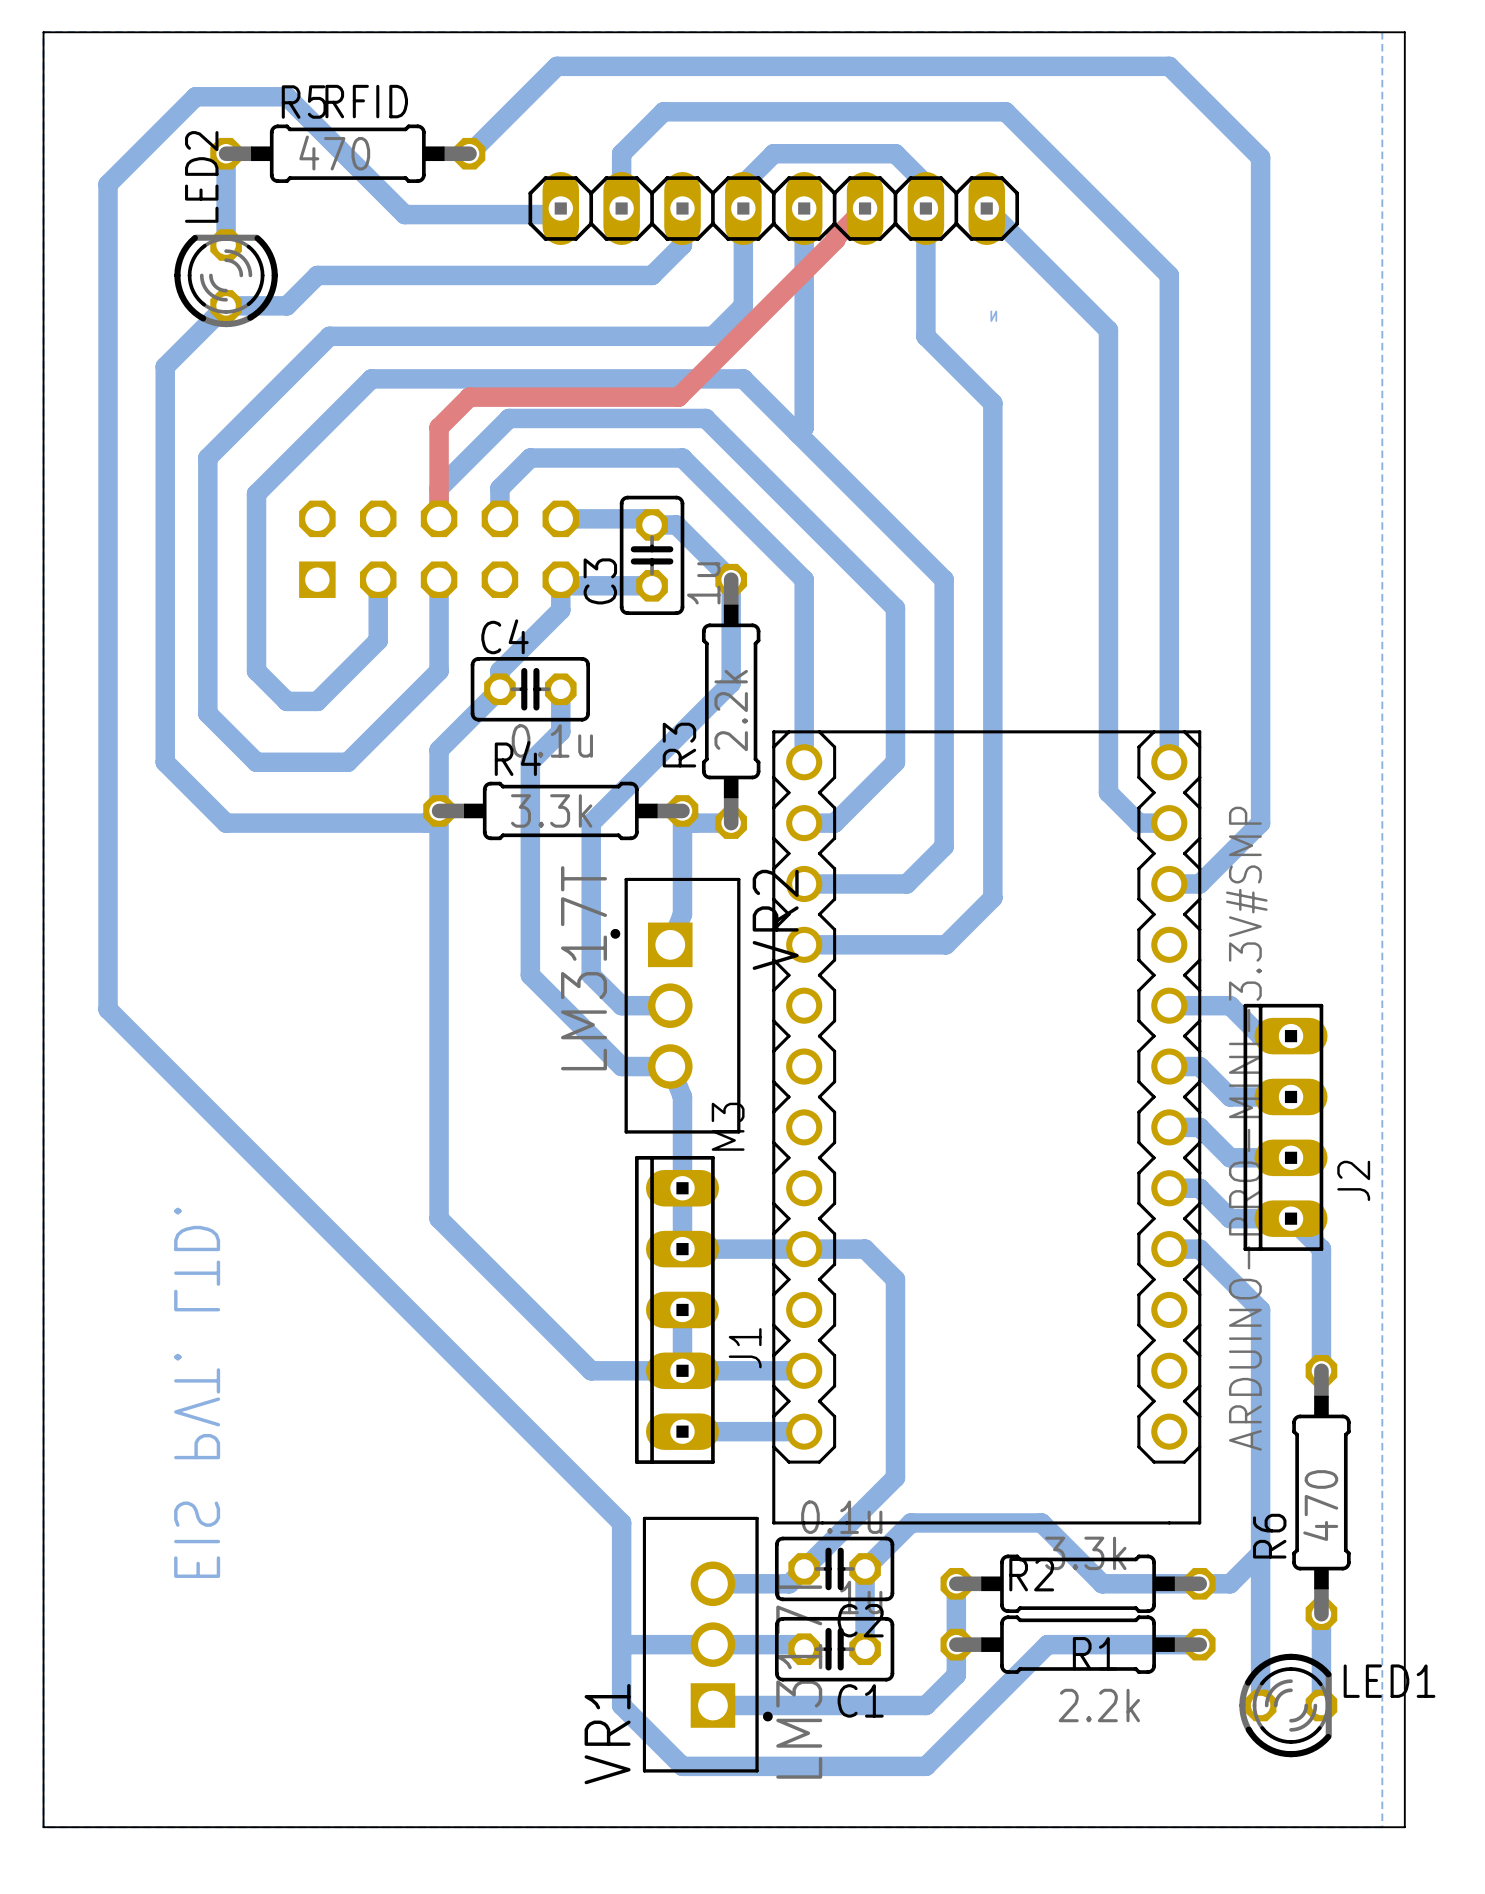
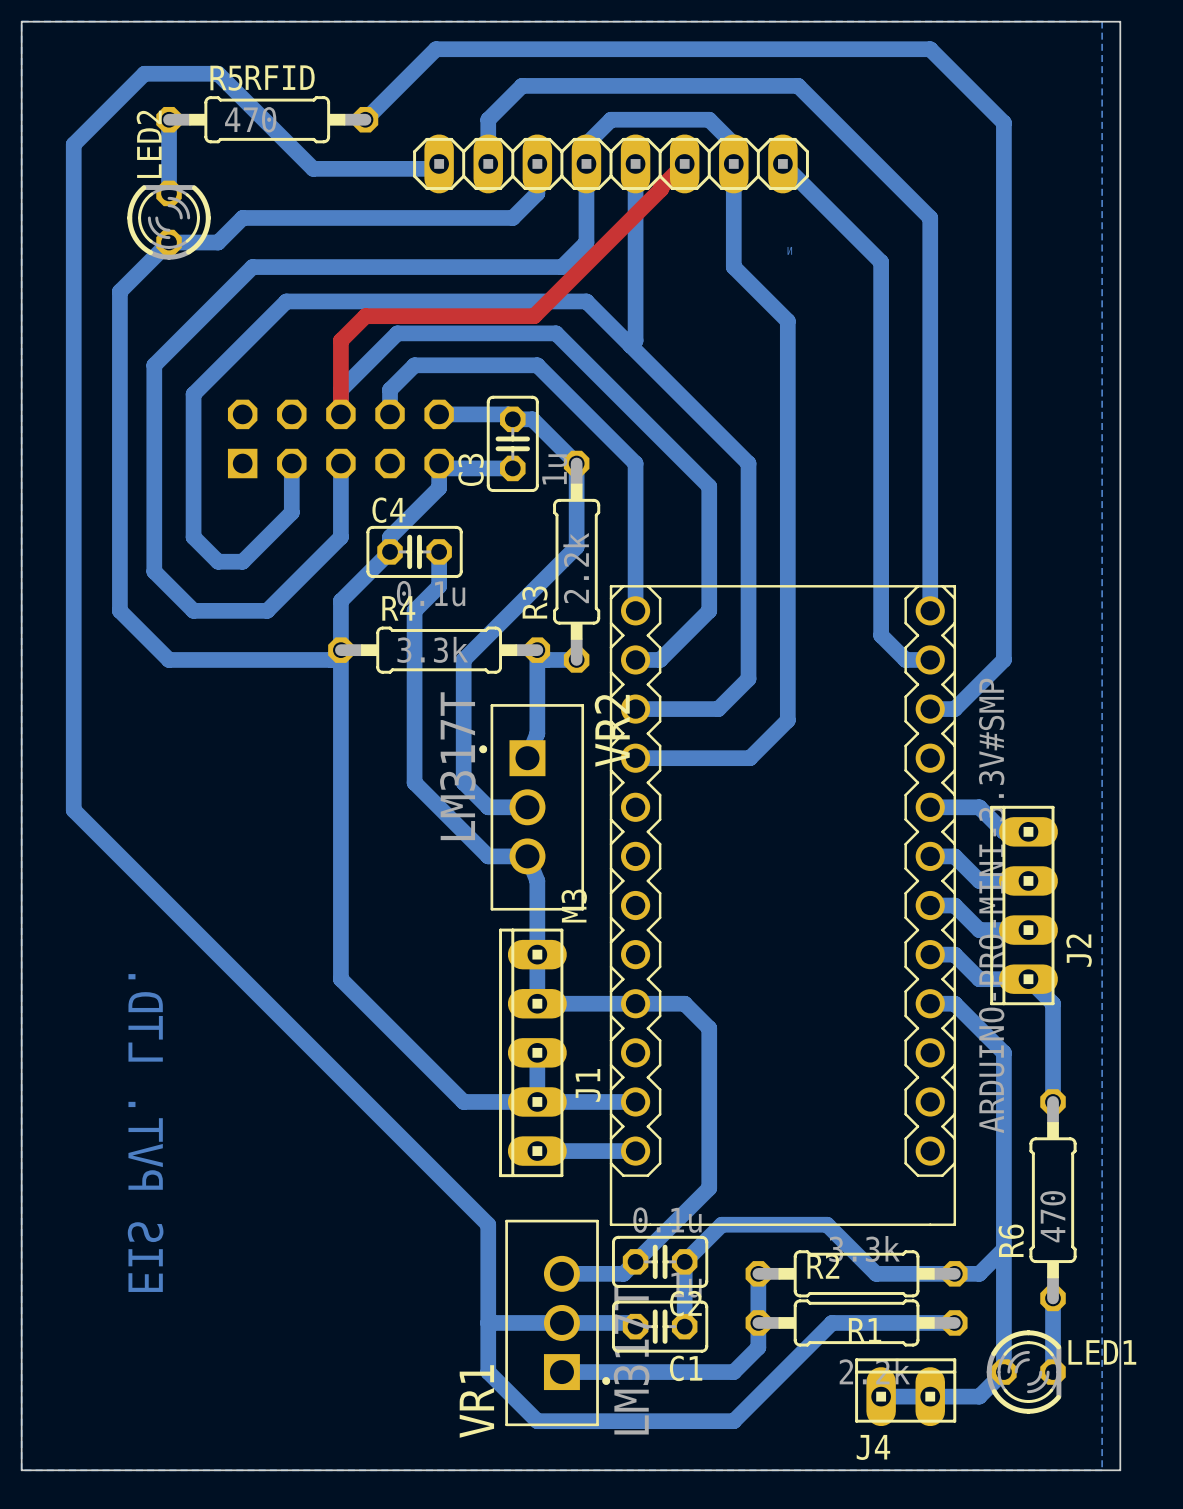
bottom track: none -> (1003, 1372) (979, 1396) (881, 1396)
J4: none -> (905, 1392)

